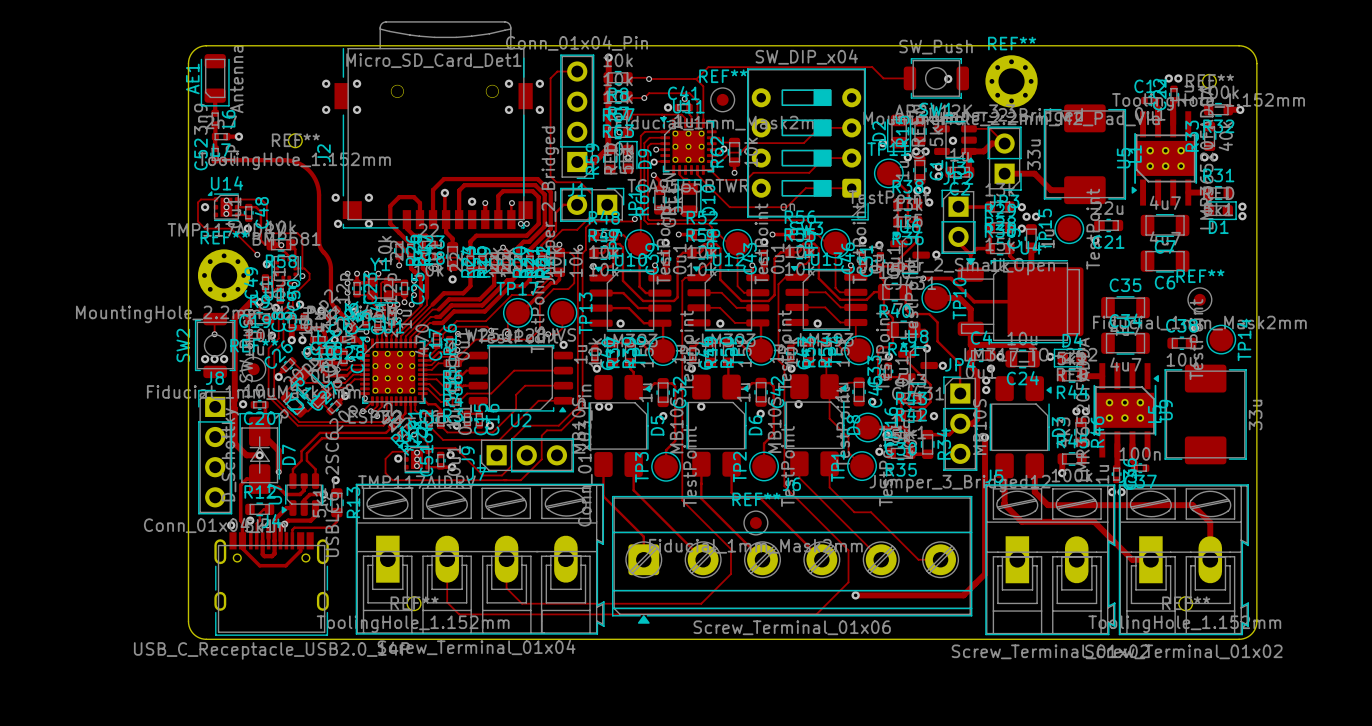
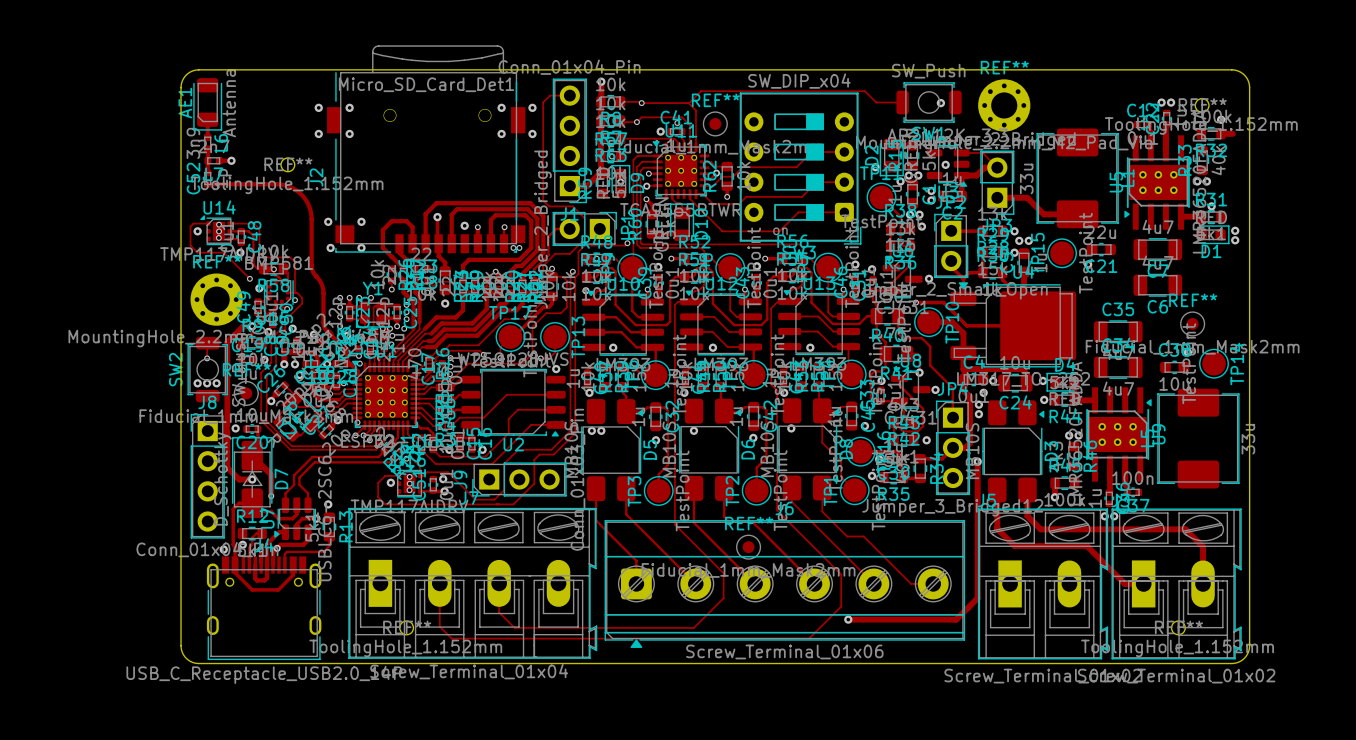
via position: (1240, 109) -> (1221, 119)
via: none -> (1211, 206)
via: none -> (1044, 399)

